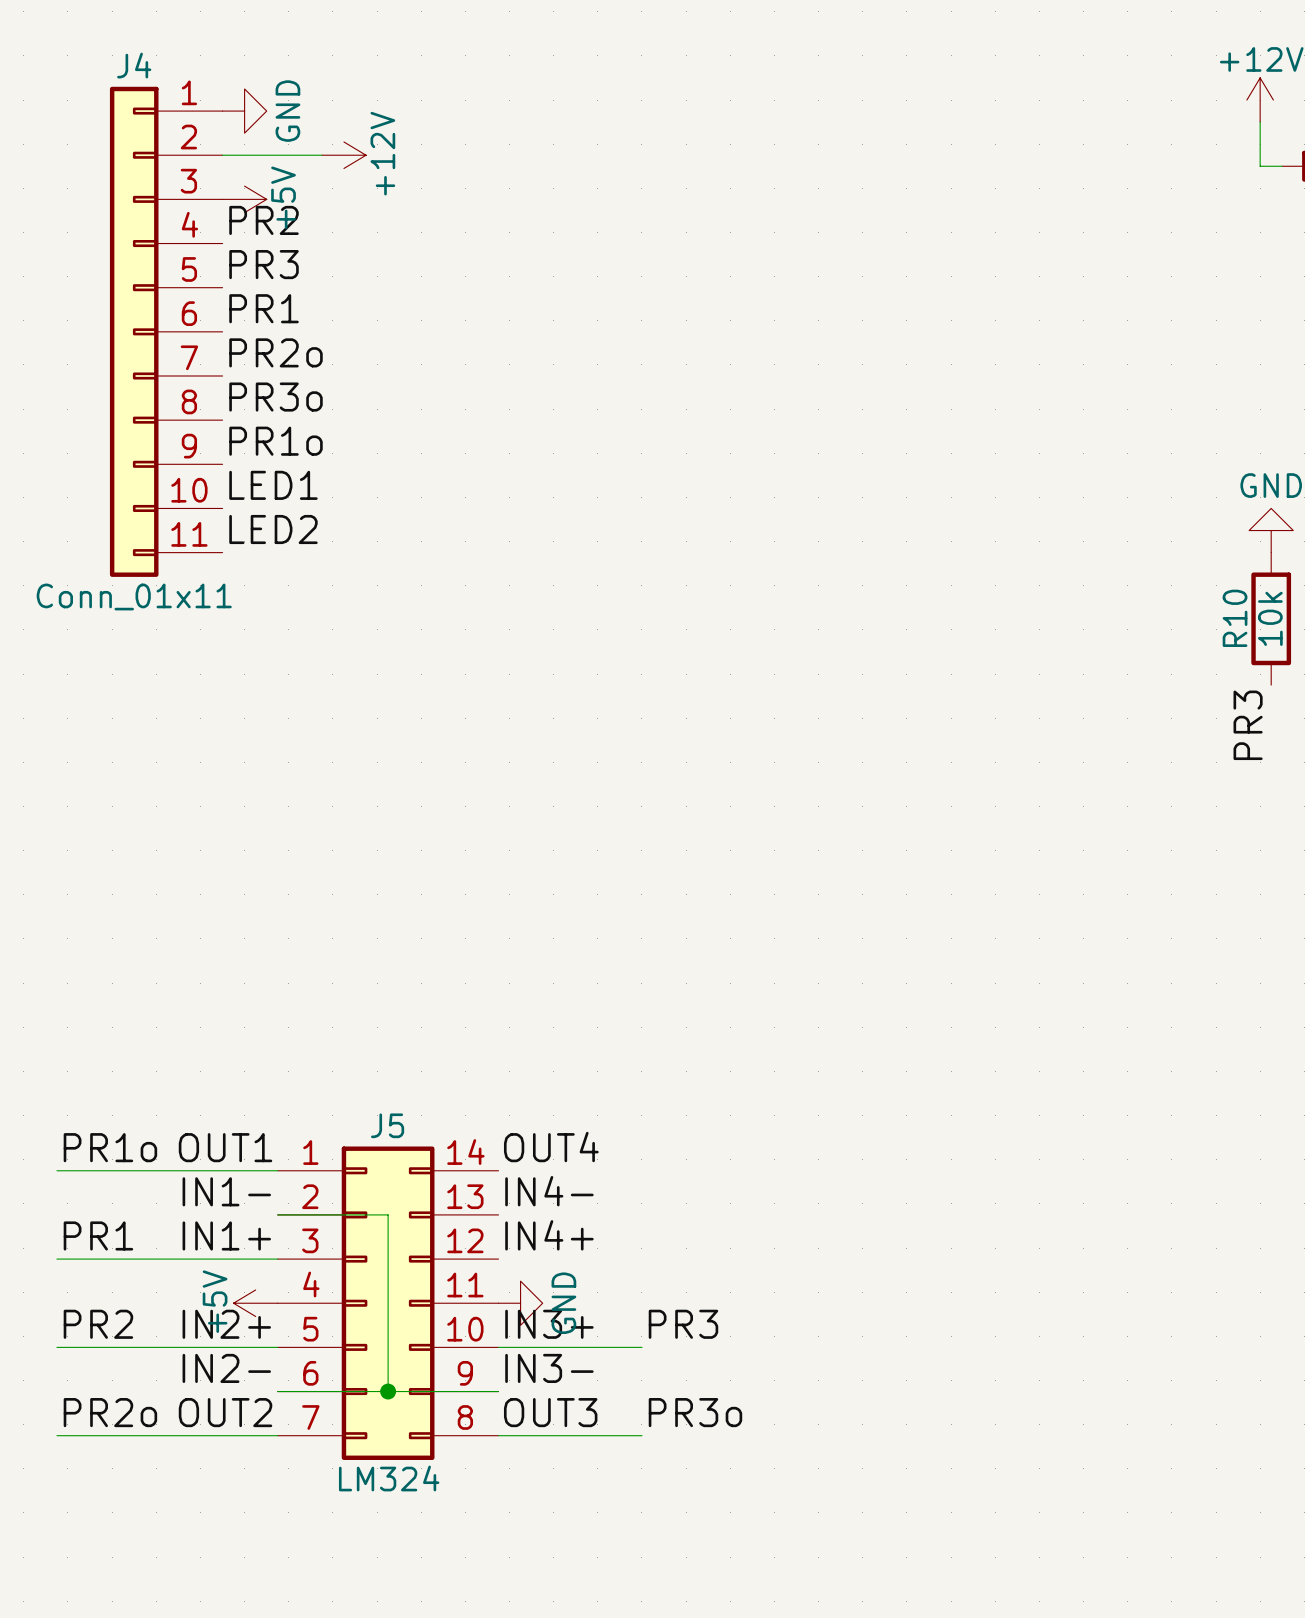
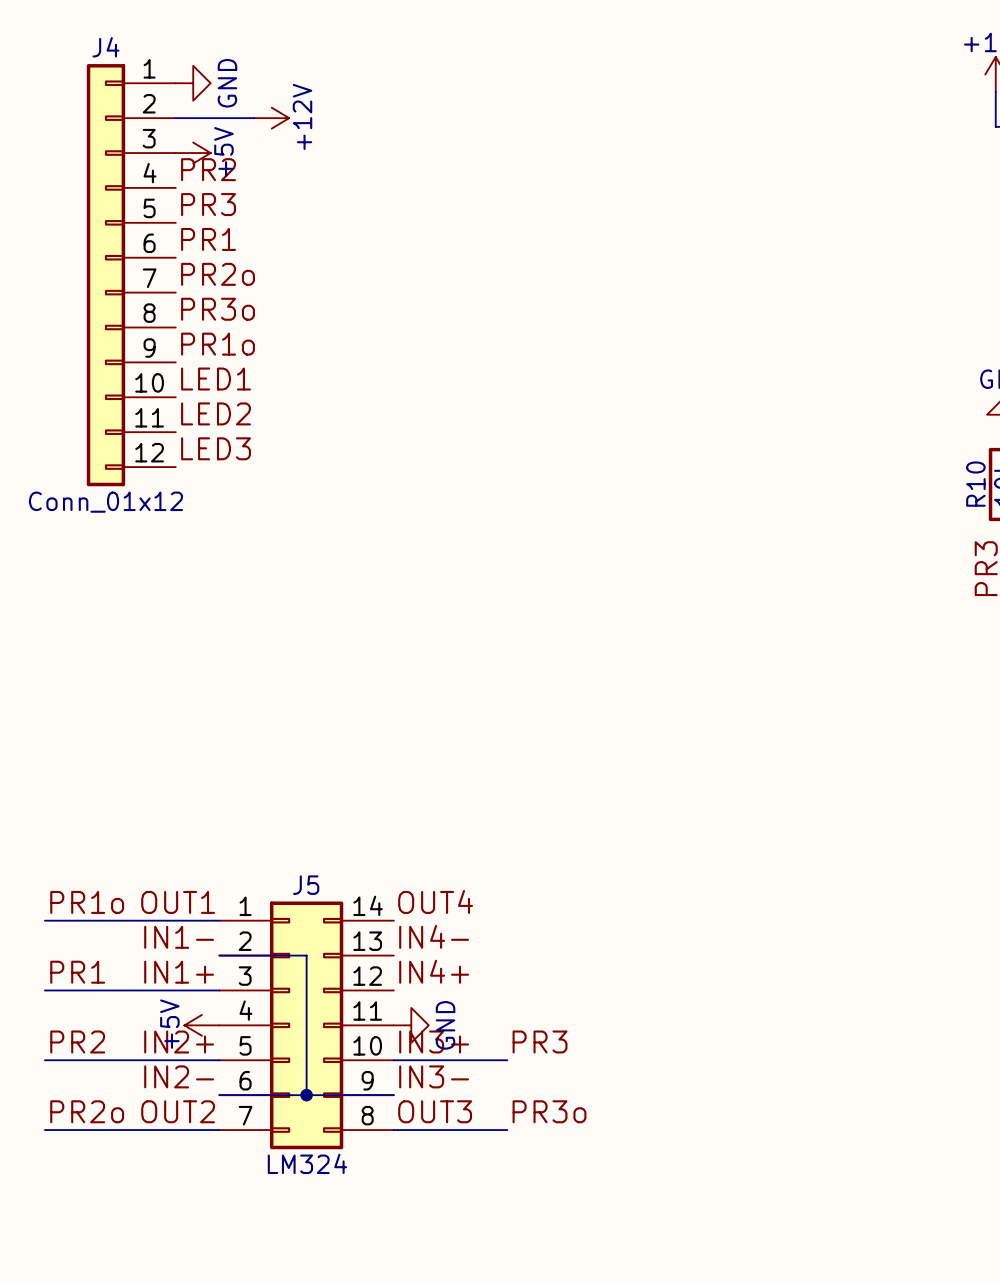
J4 symbol: [109, 86, 223, 577] -> [86, 64, 176, 487]
label: none -> LED3 (216, 448)
J4 value: Conn_01x11 (134, 596) -> Conn_01x12 (105, 502)

